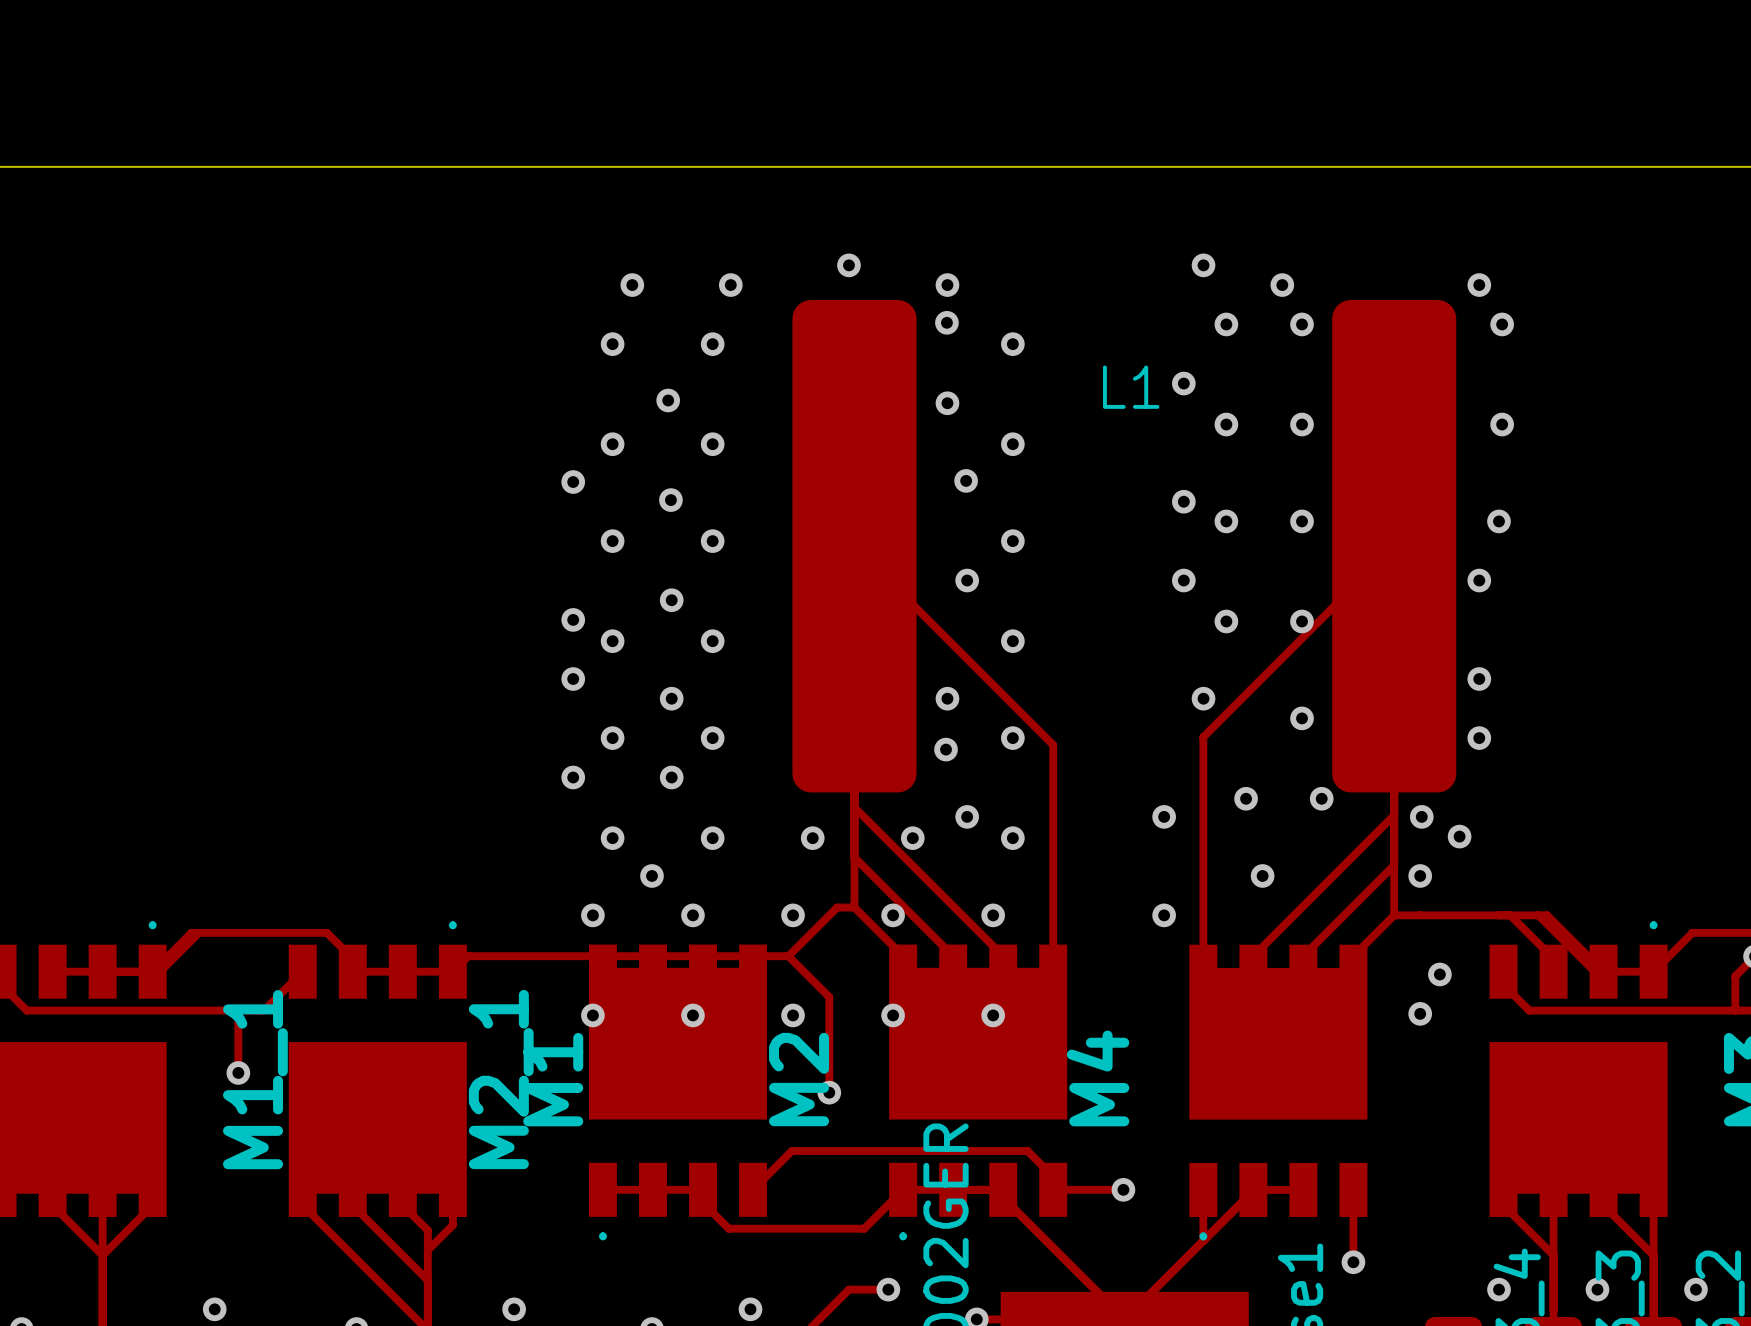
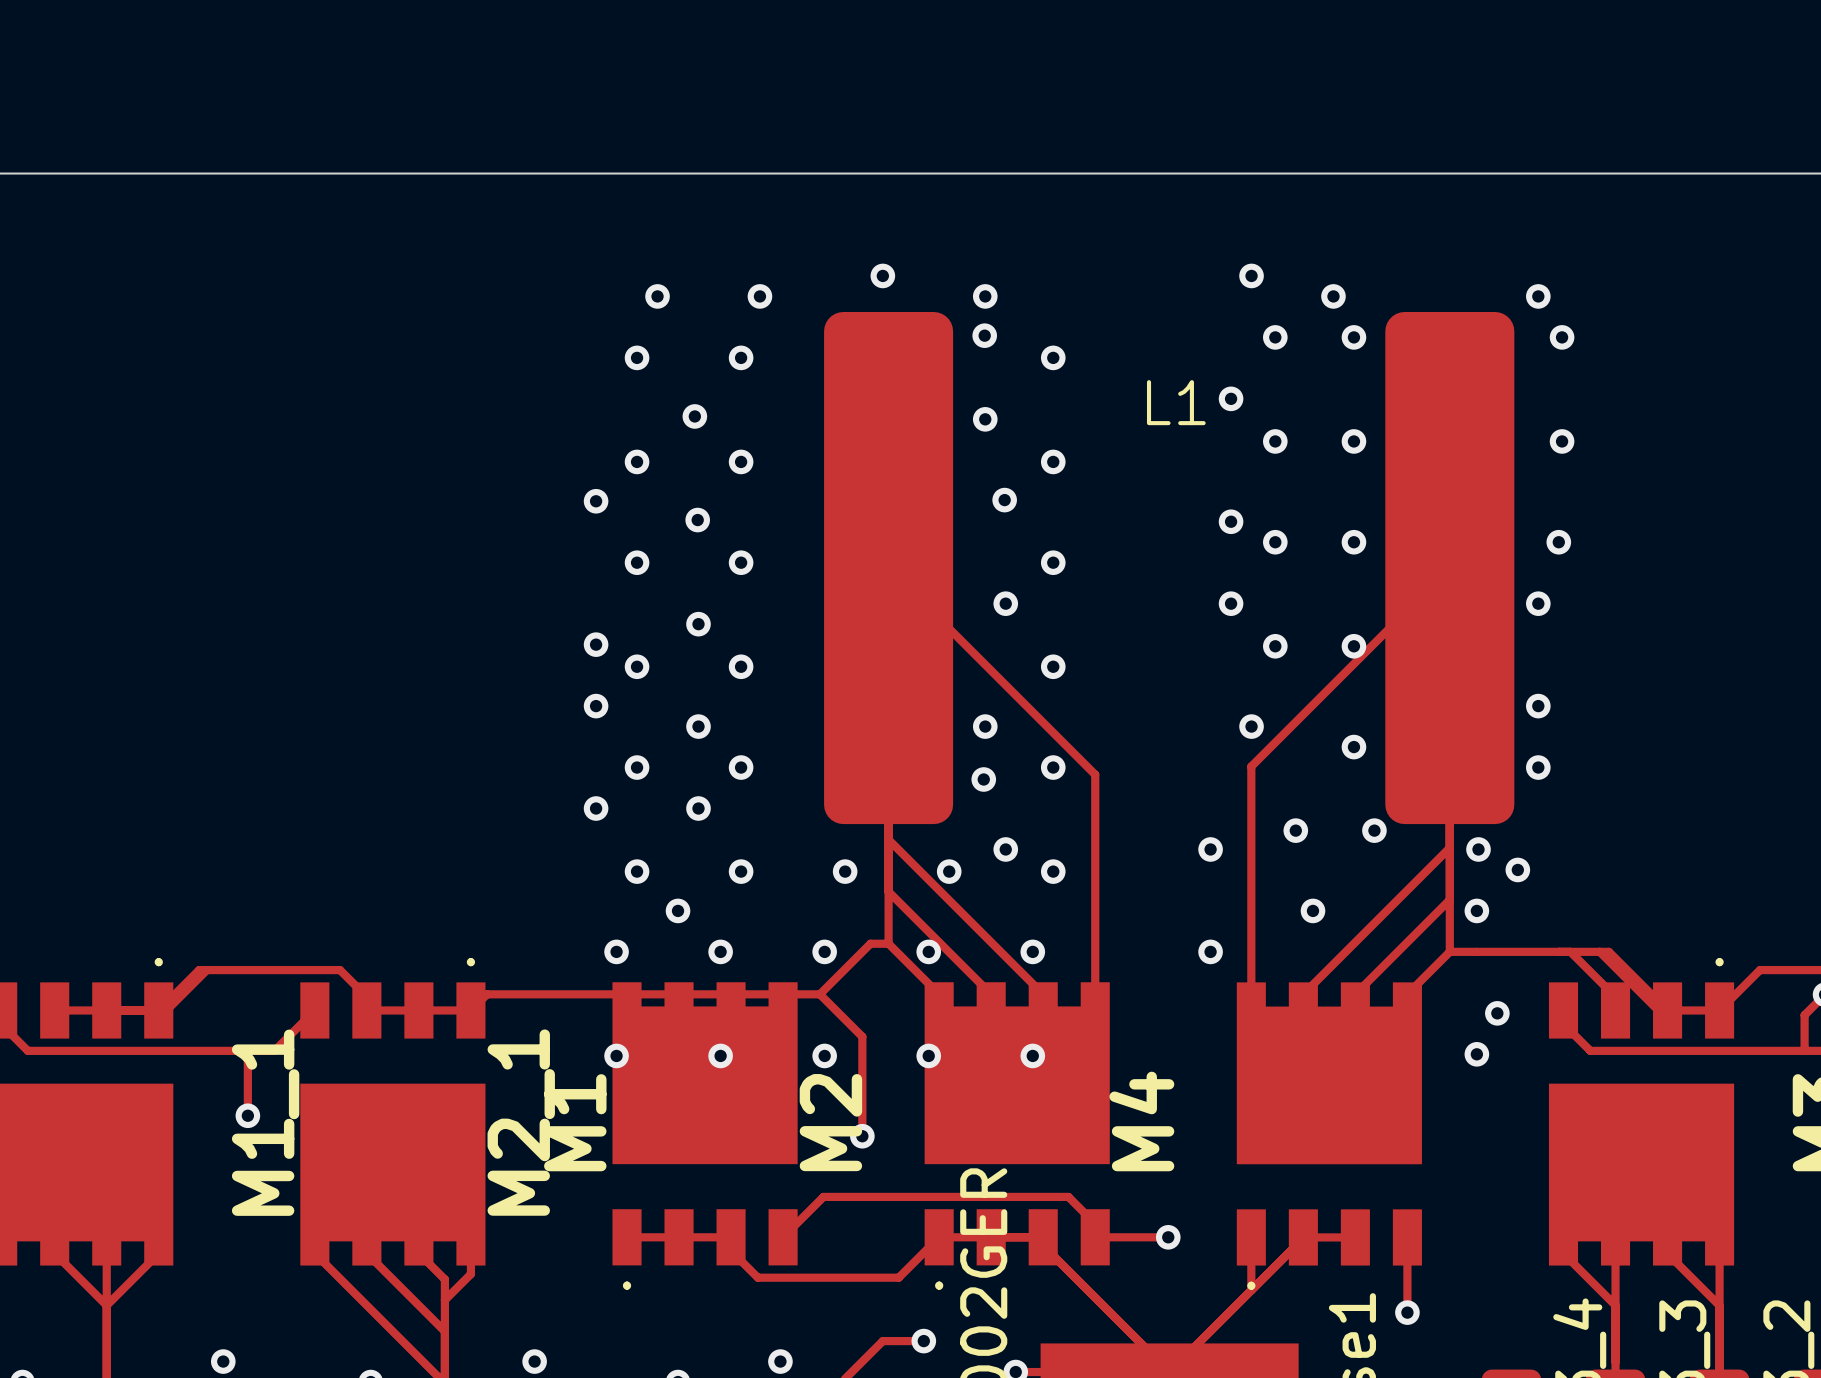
via: (1498, 1289) -> none
via: (1597, 1289) -> none
via: (1695, 1289) -> none

